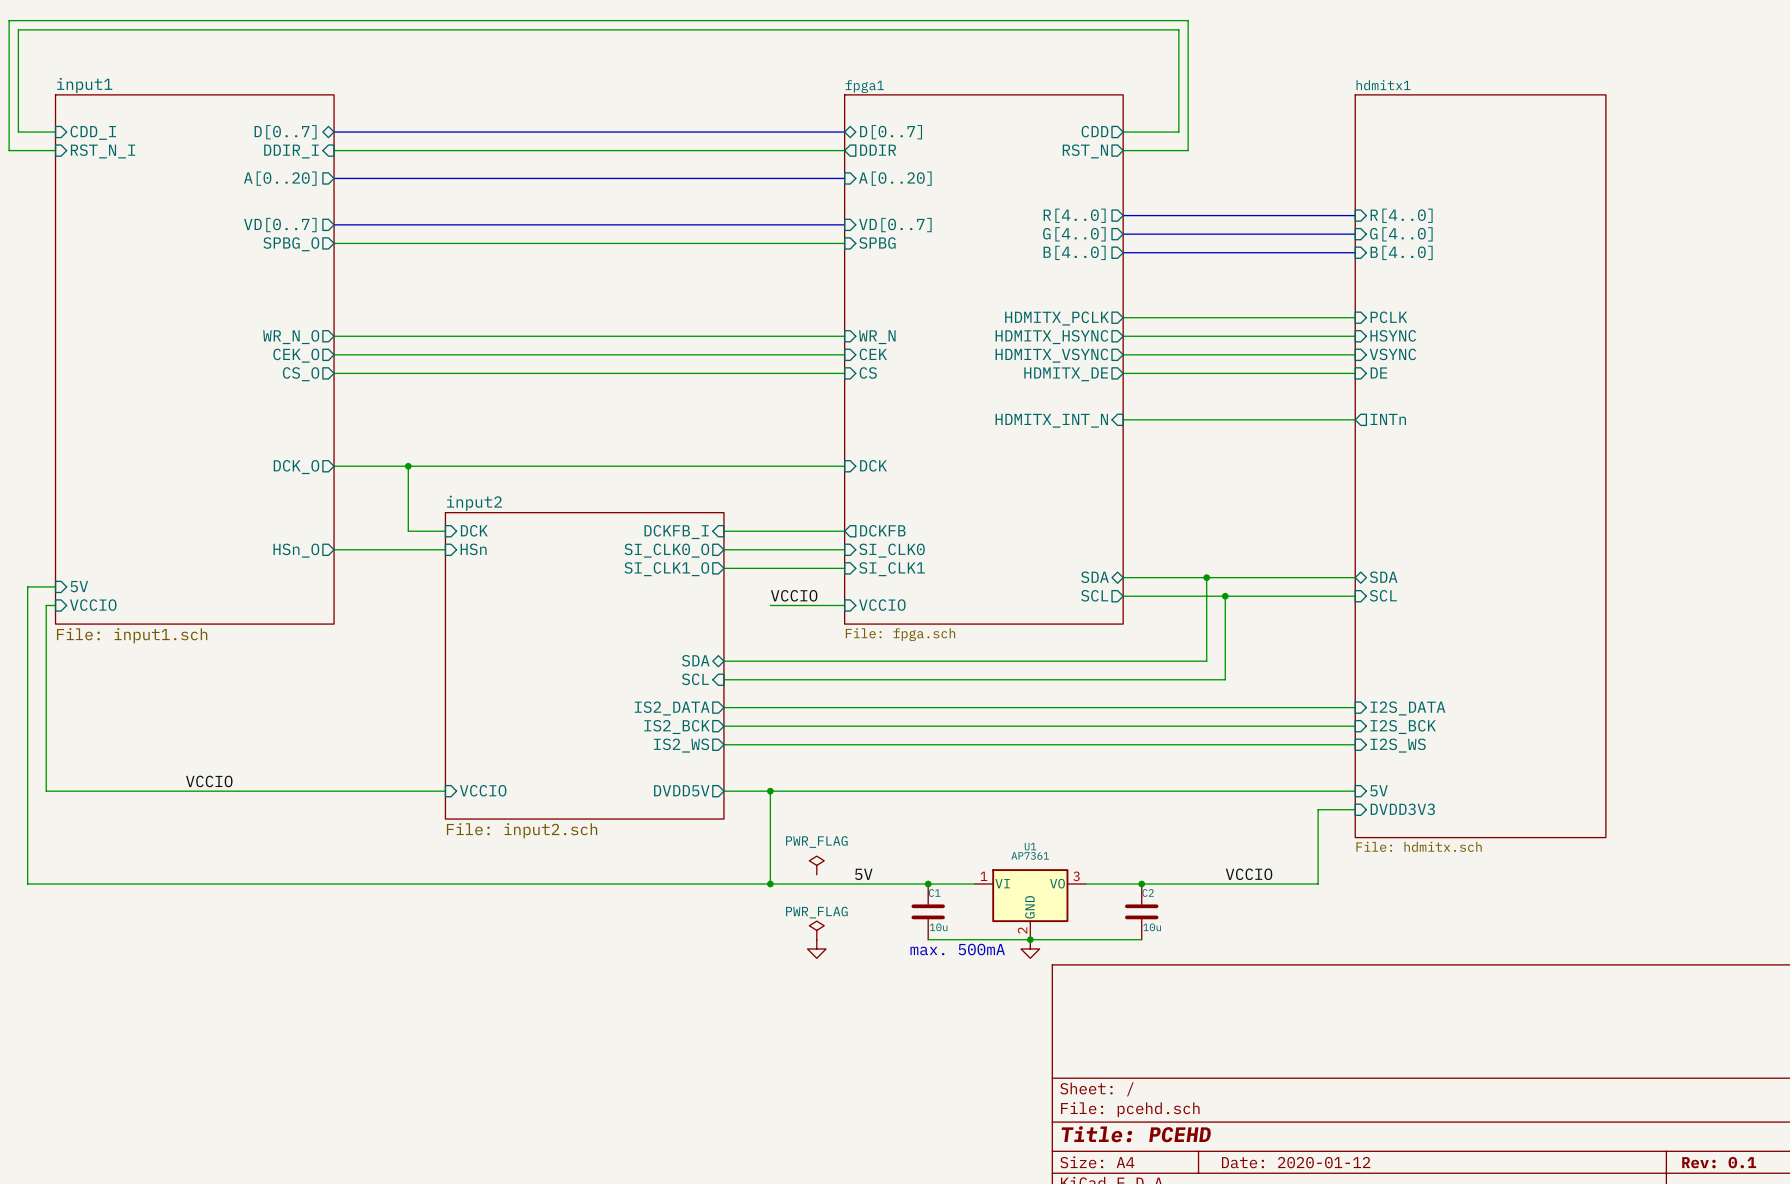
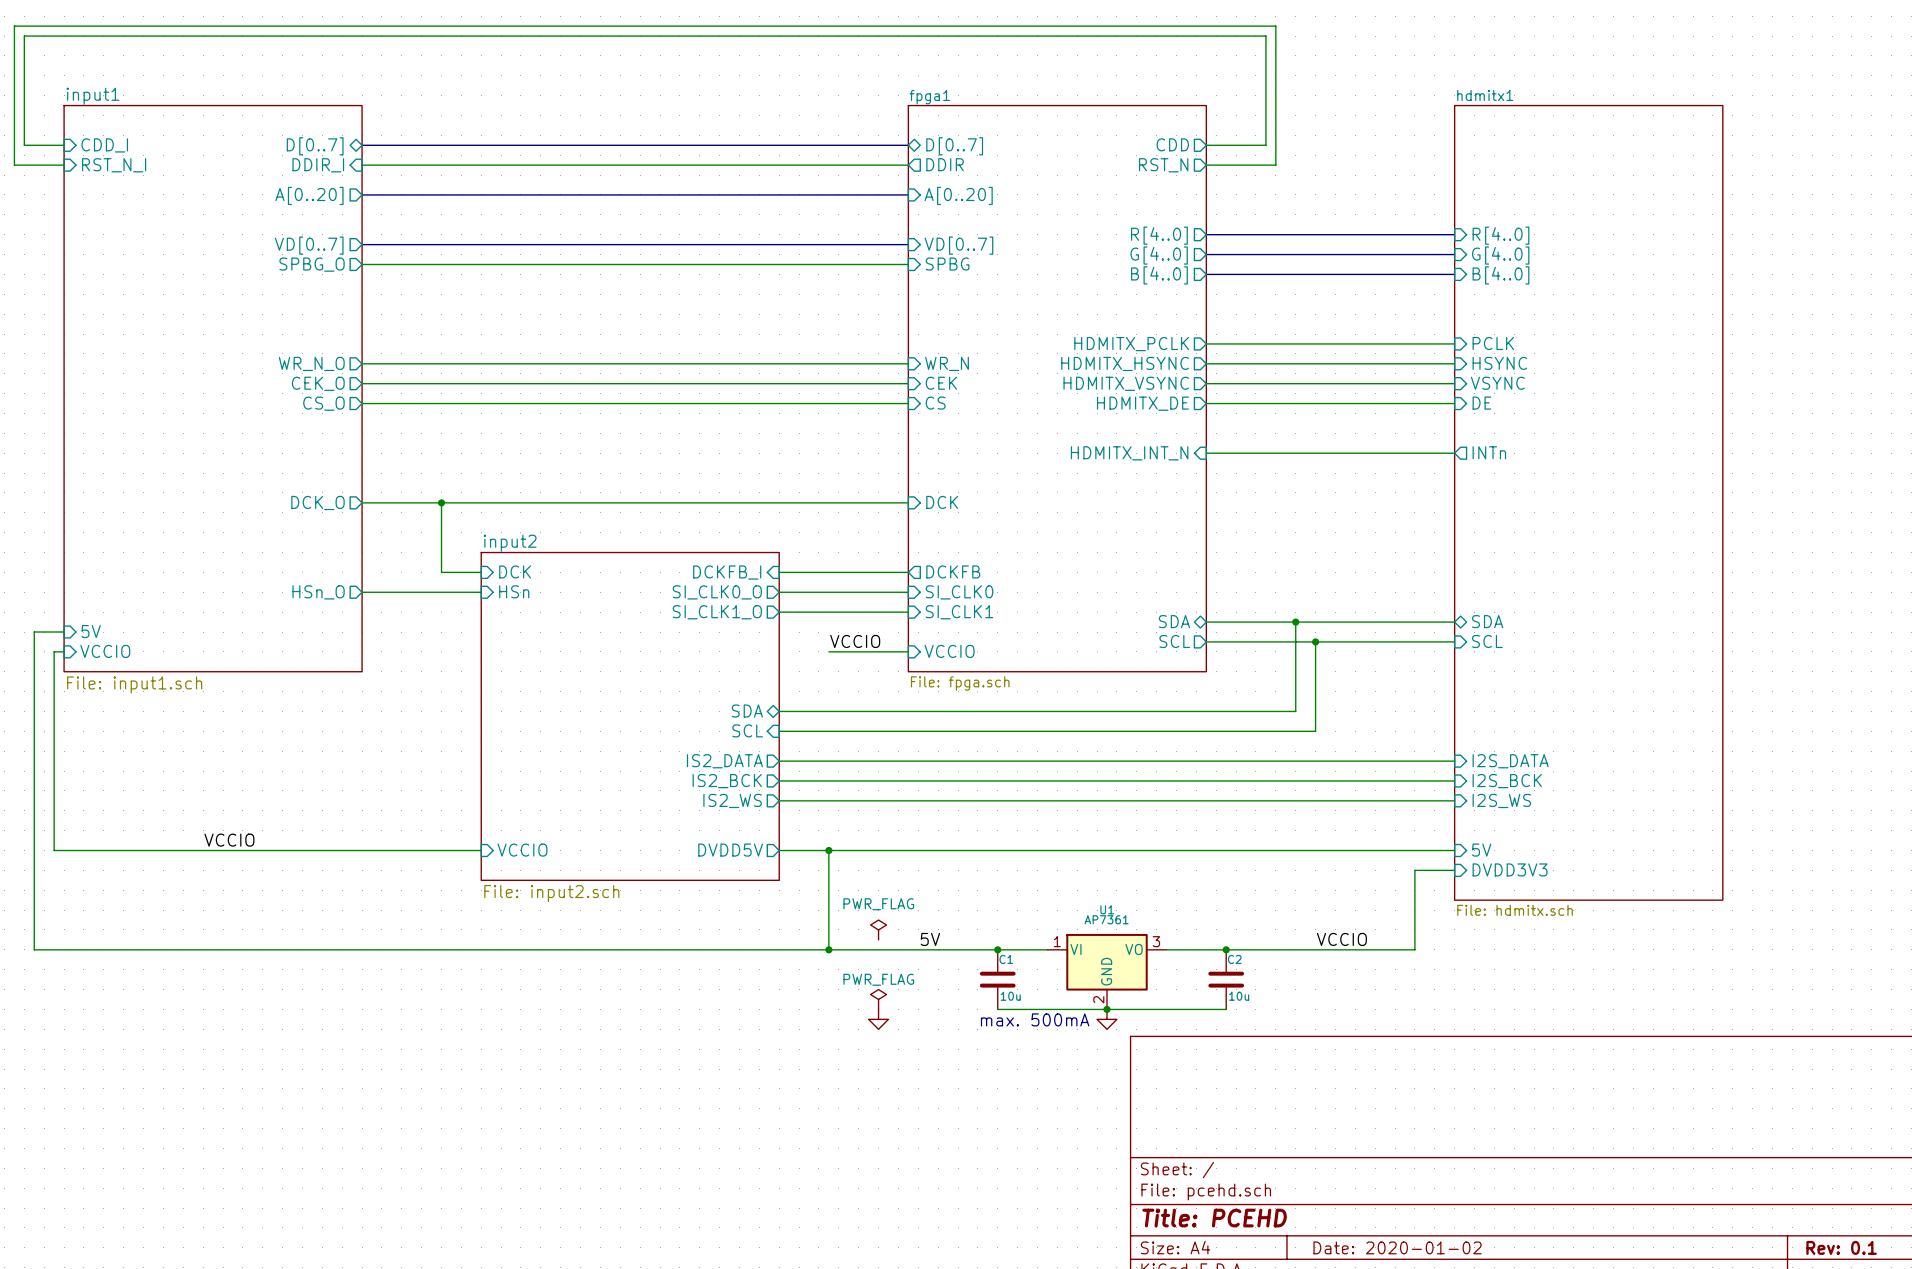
title block: Date: 2020-01-12 (1296, 1162) -> Date: 2020-01-02 (1397, 1247)

